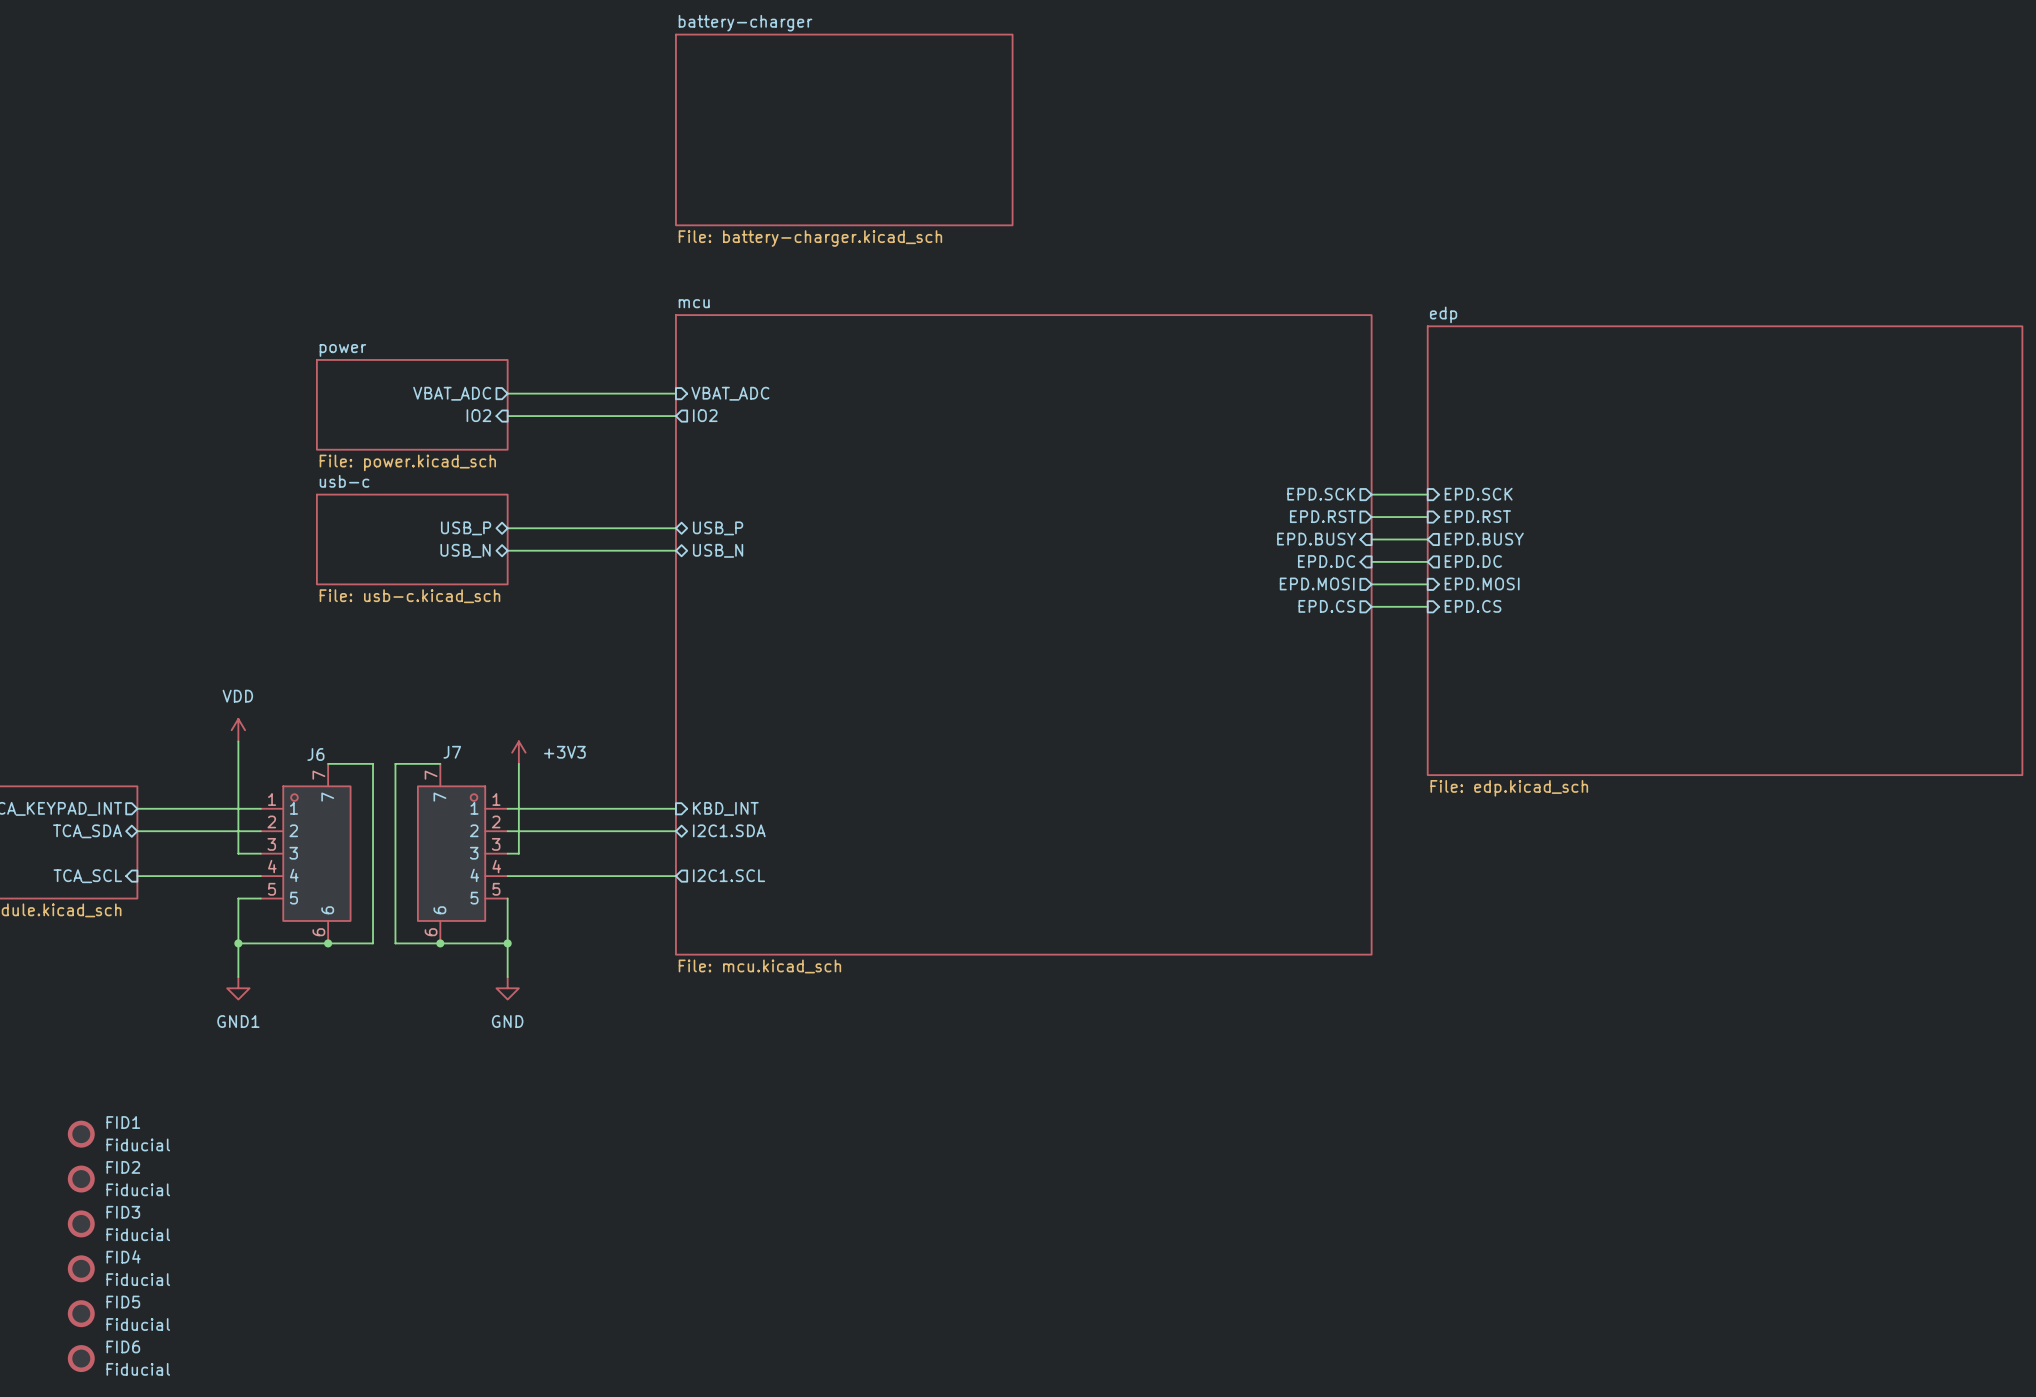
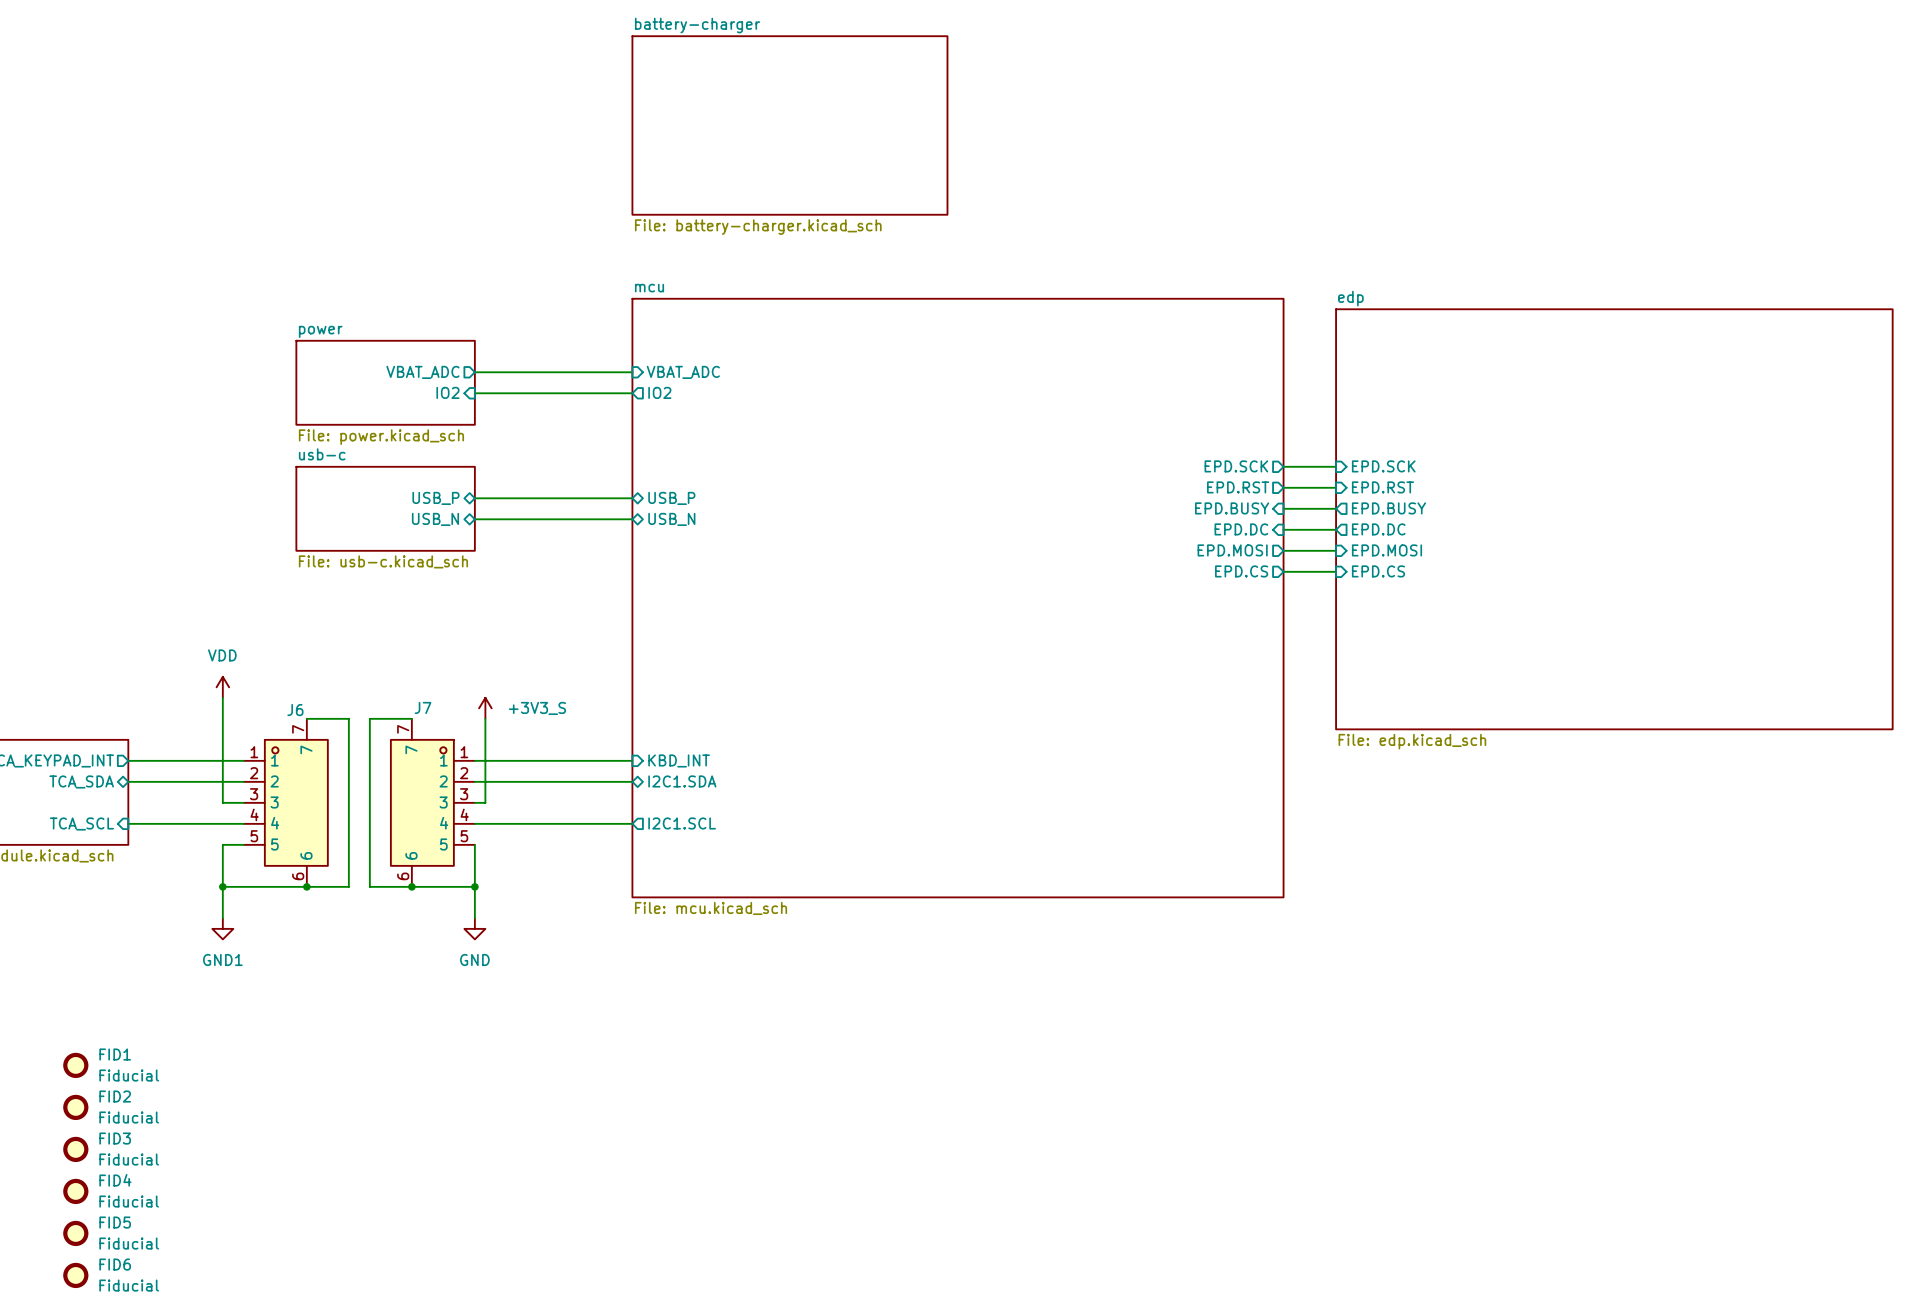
power symbol: +3V3 (518, 752) -> +3V3_S (485, 708)

